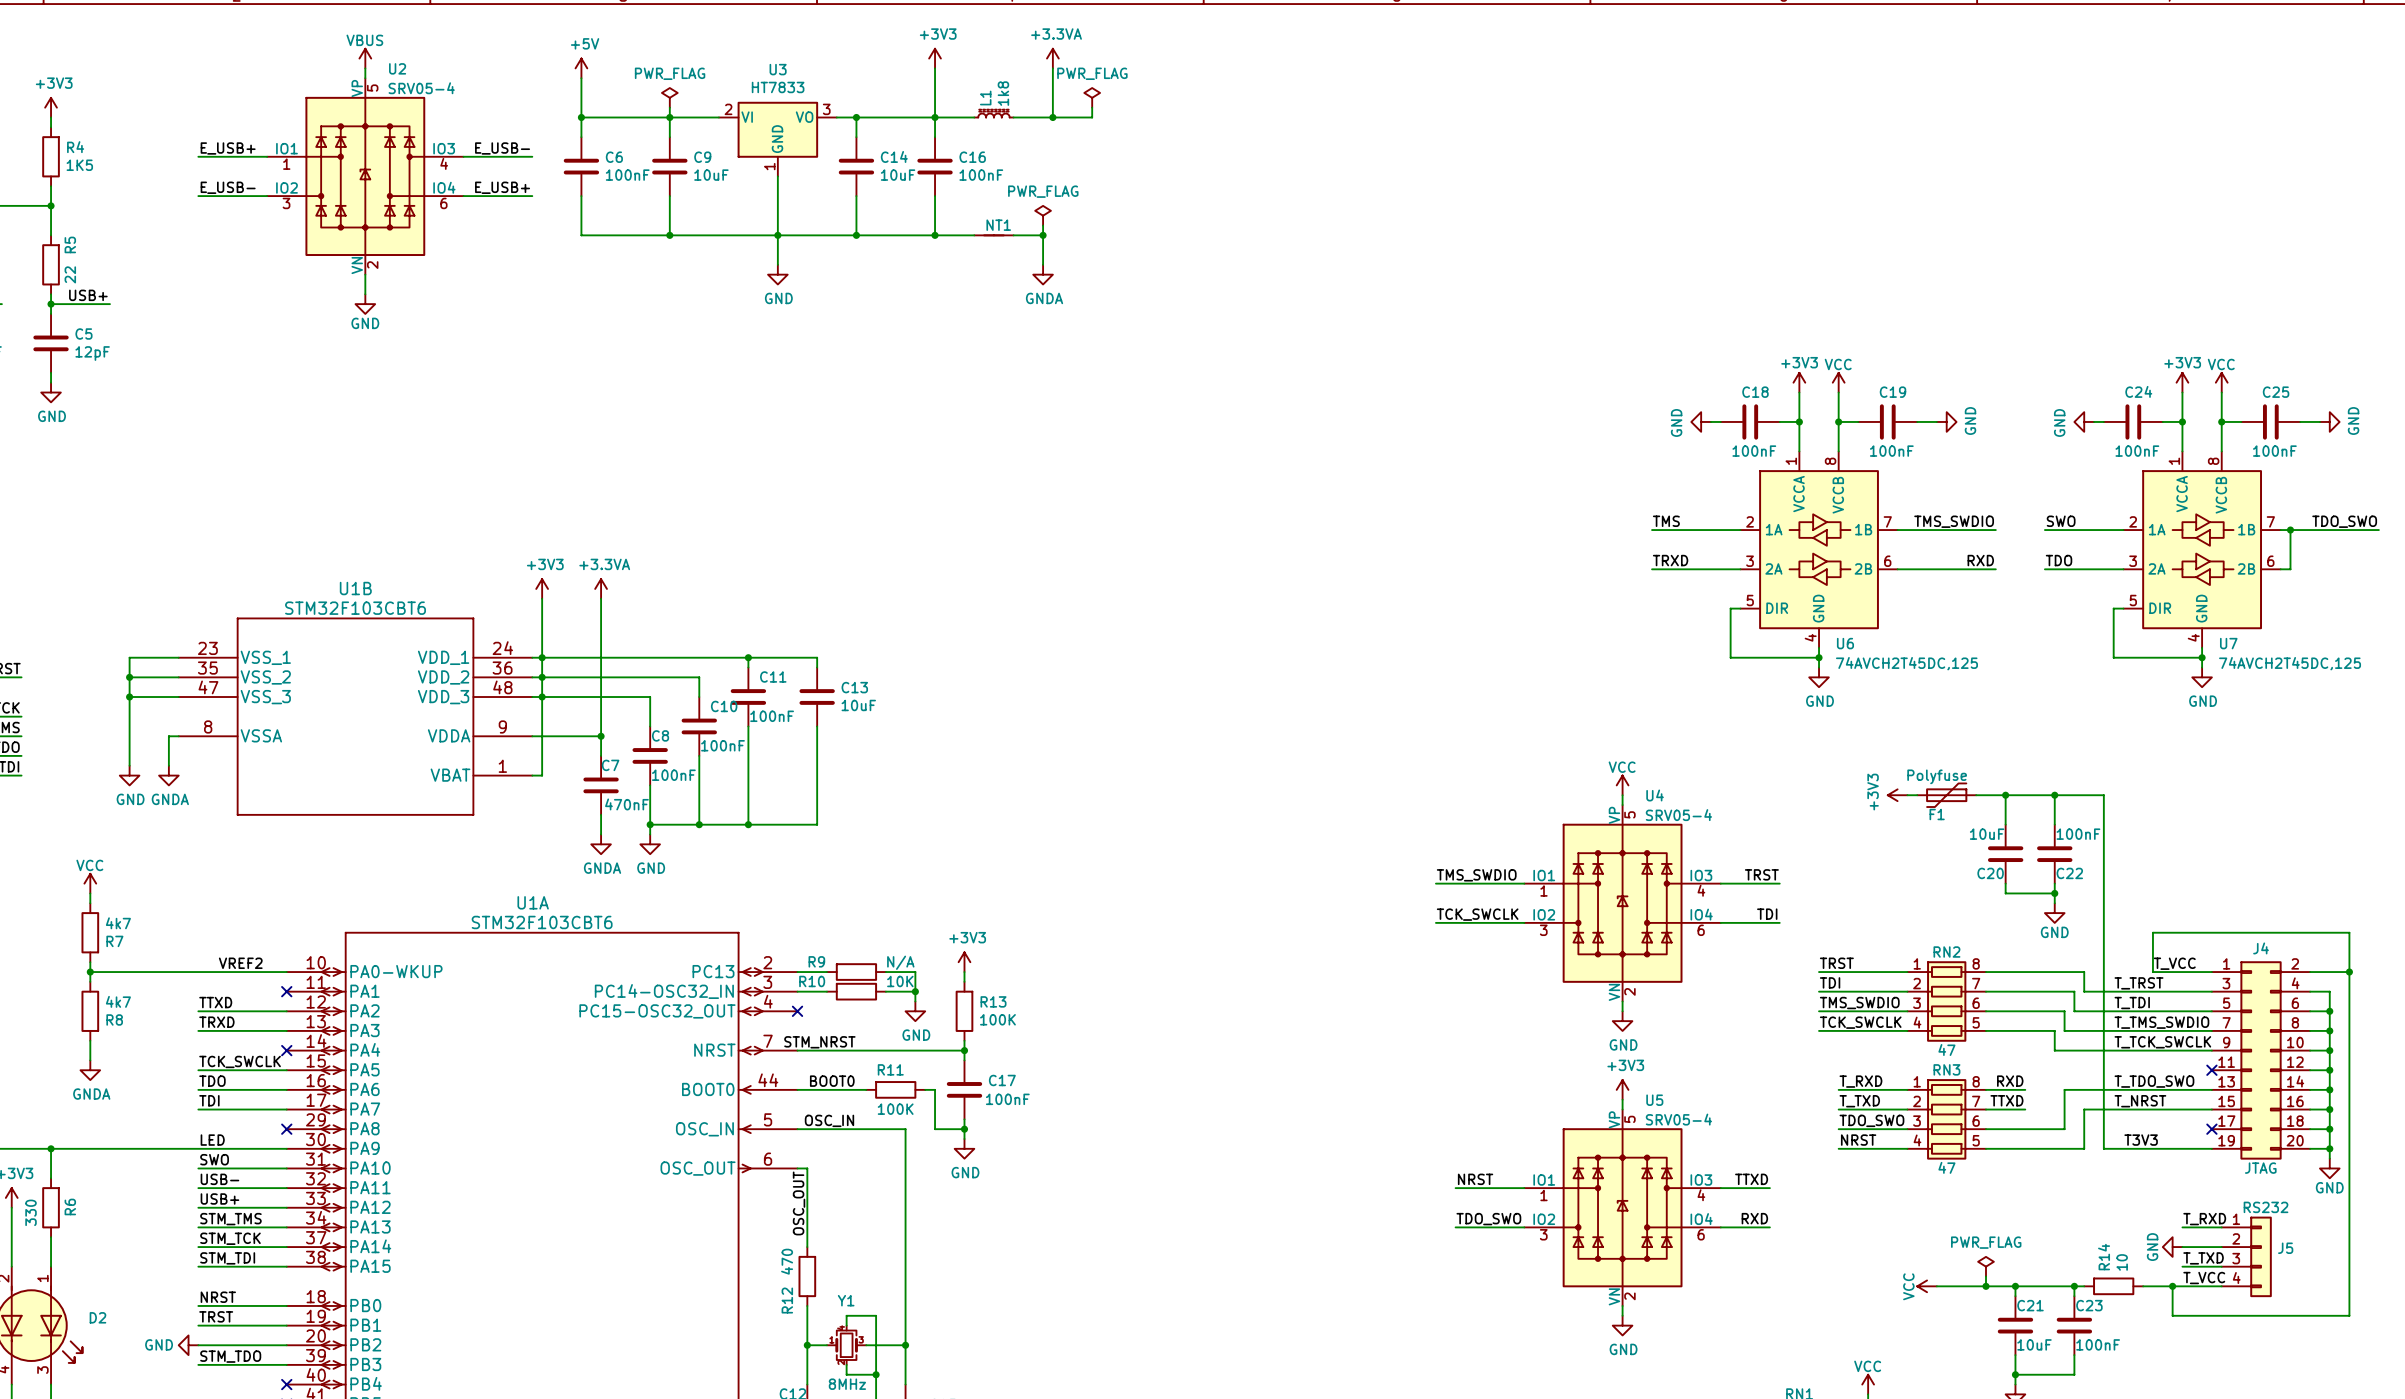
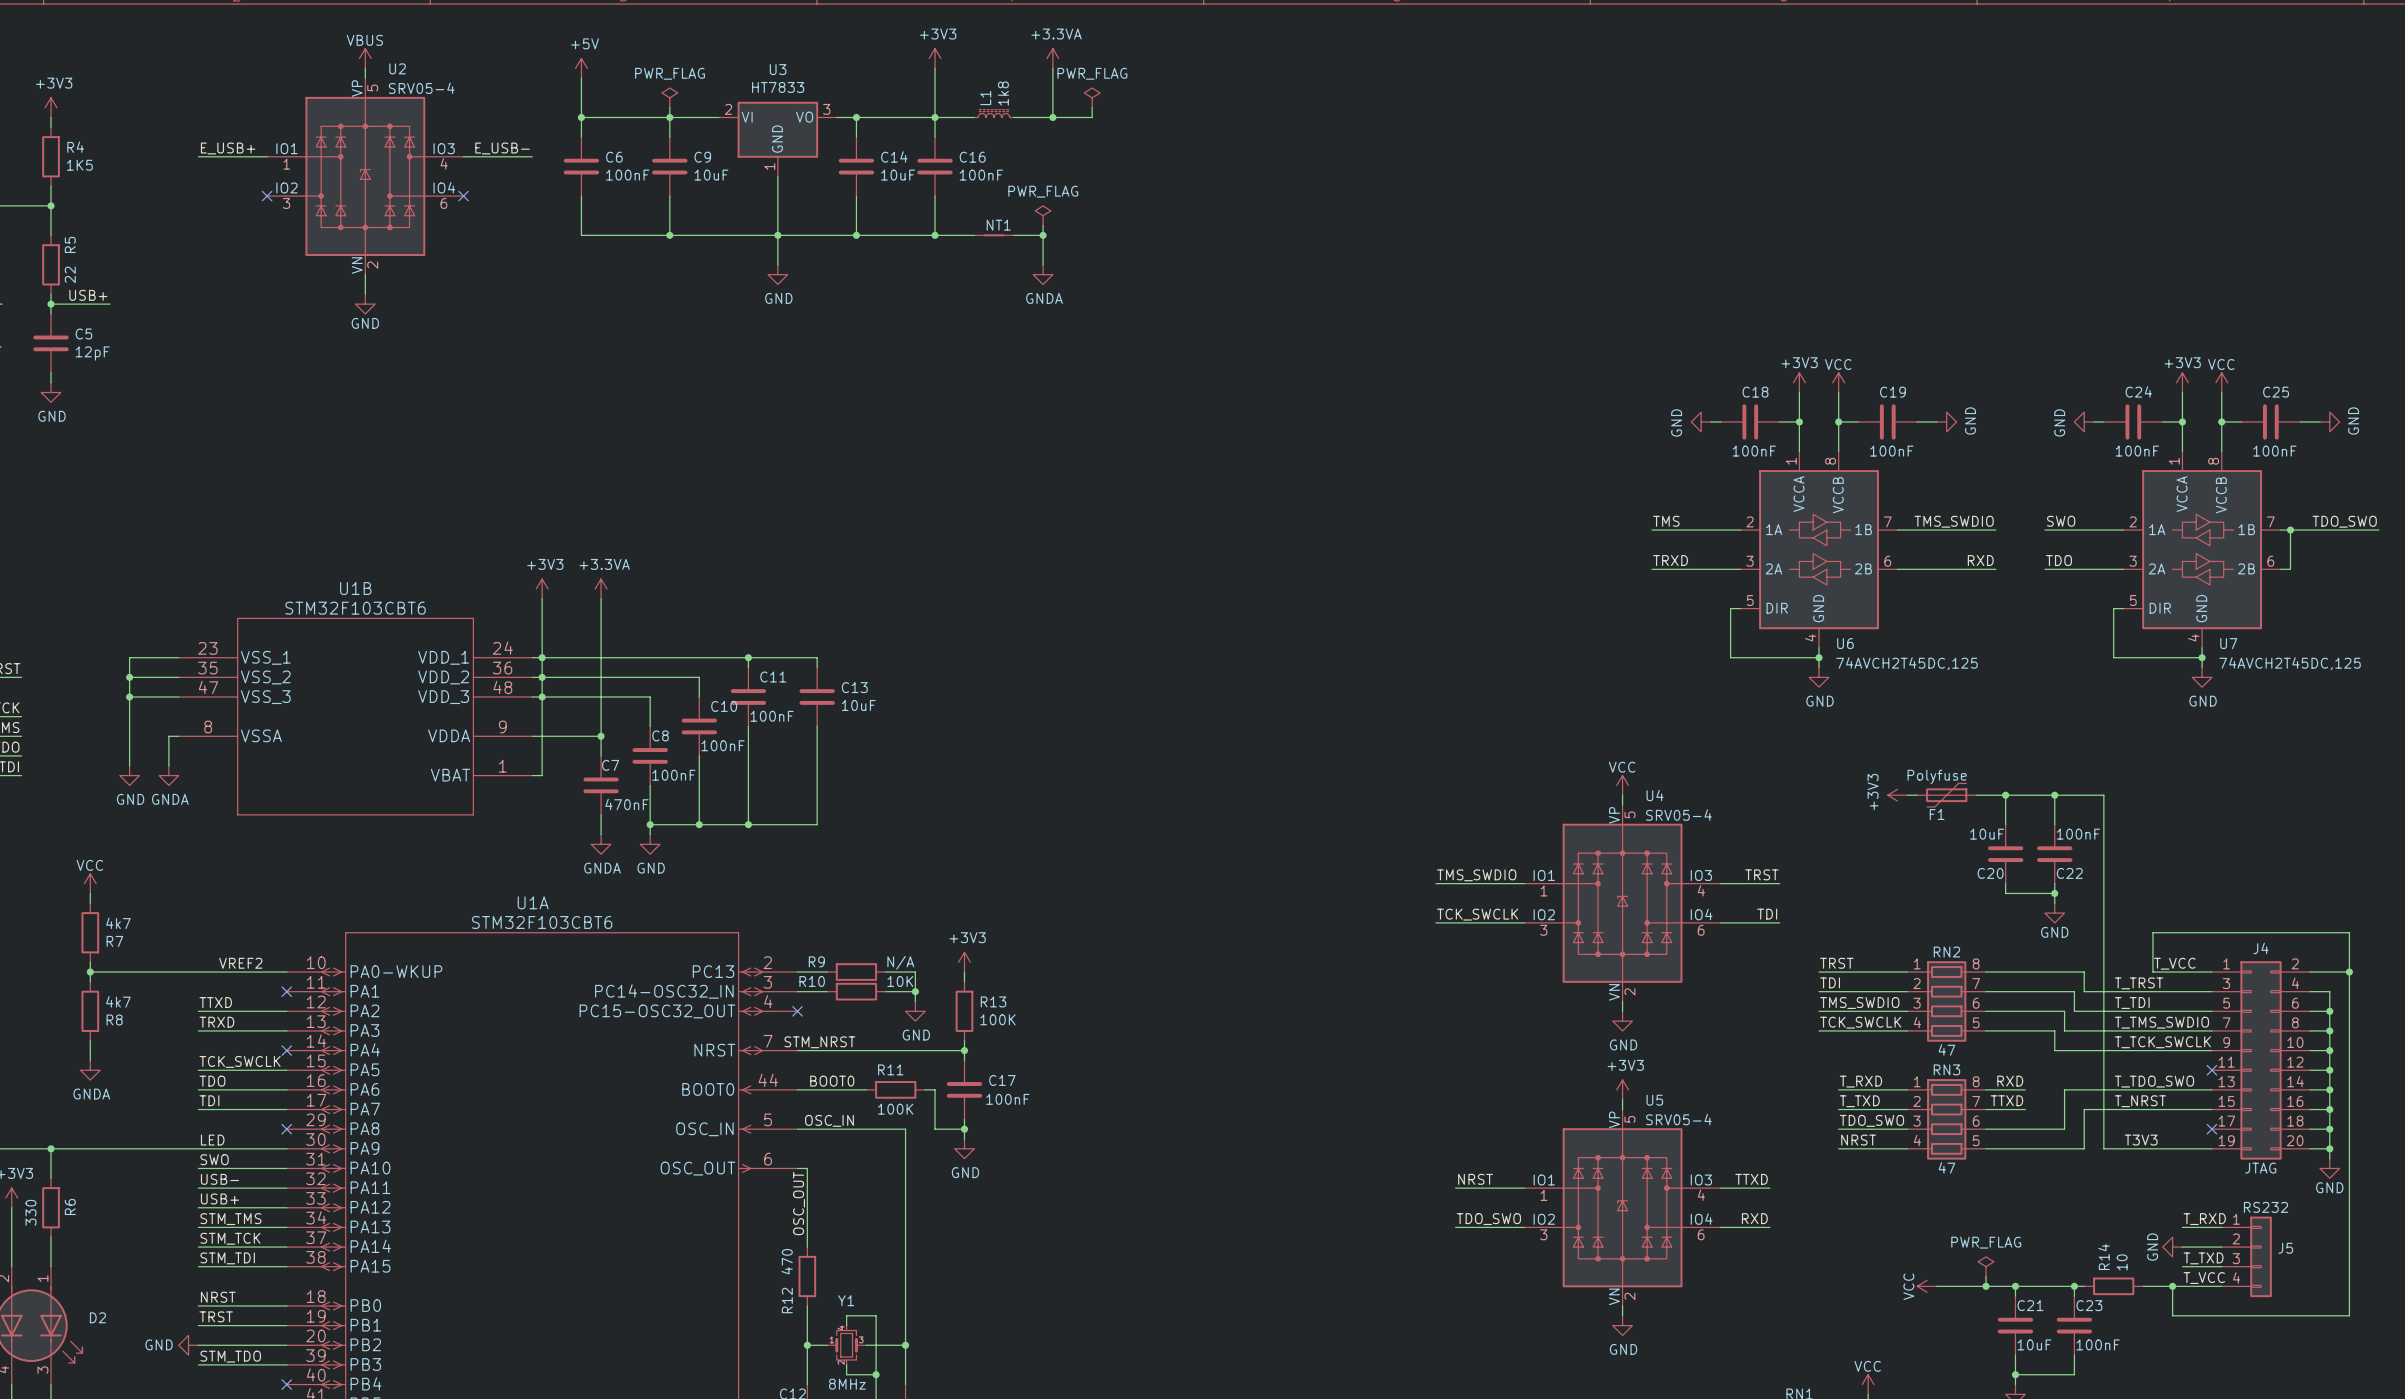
label: E_USB- (228, 187) -> none
label: E_USB+ (502, 187) -> none
wire: (198, 196) (267, 196) -> none
no-connect mark: none -> (267, 196)
wire: (463, 196) (532, 196) -> none
no-connect mark: none -> (463, 196)

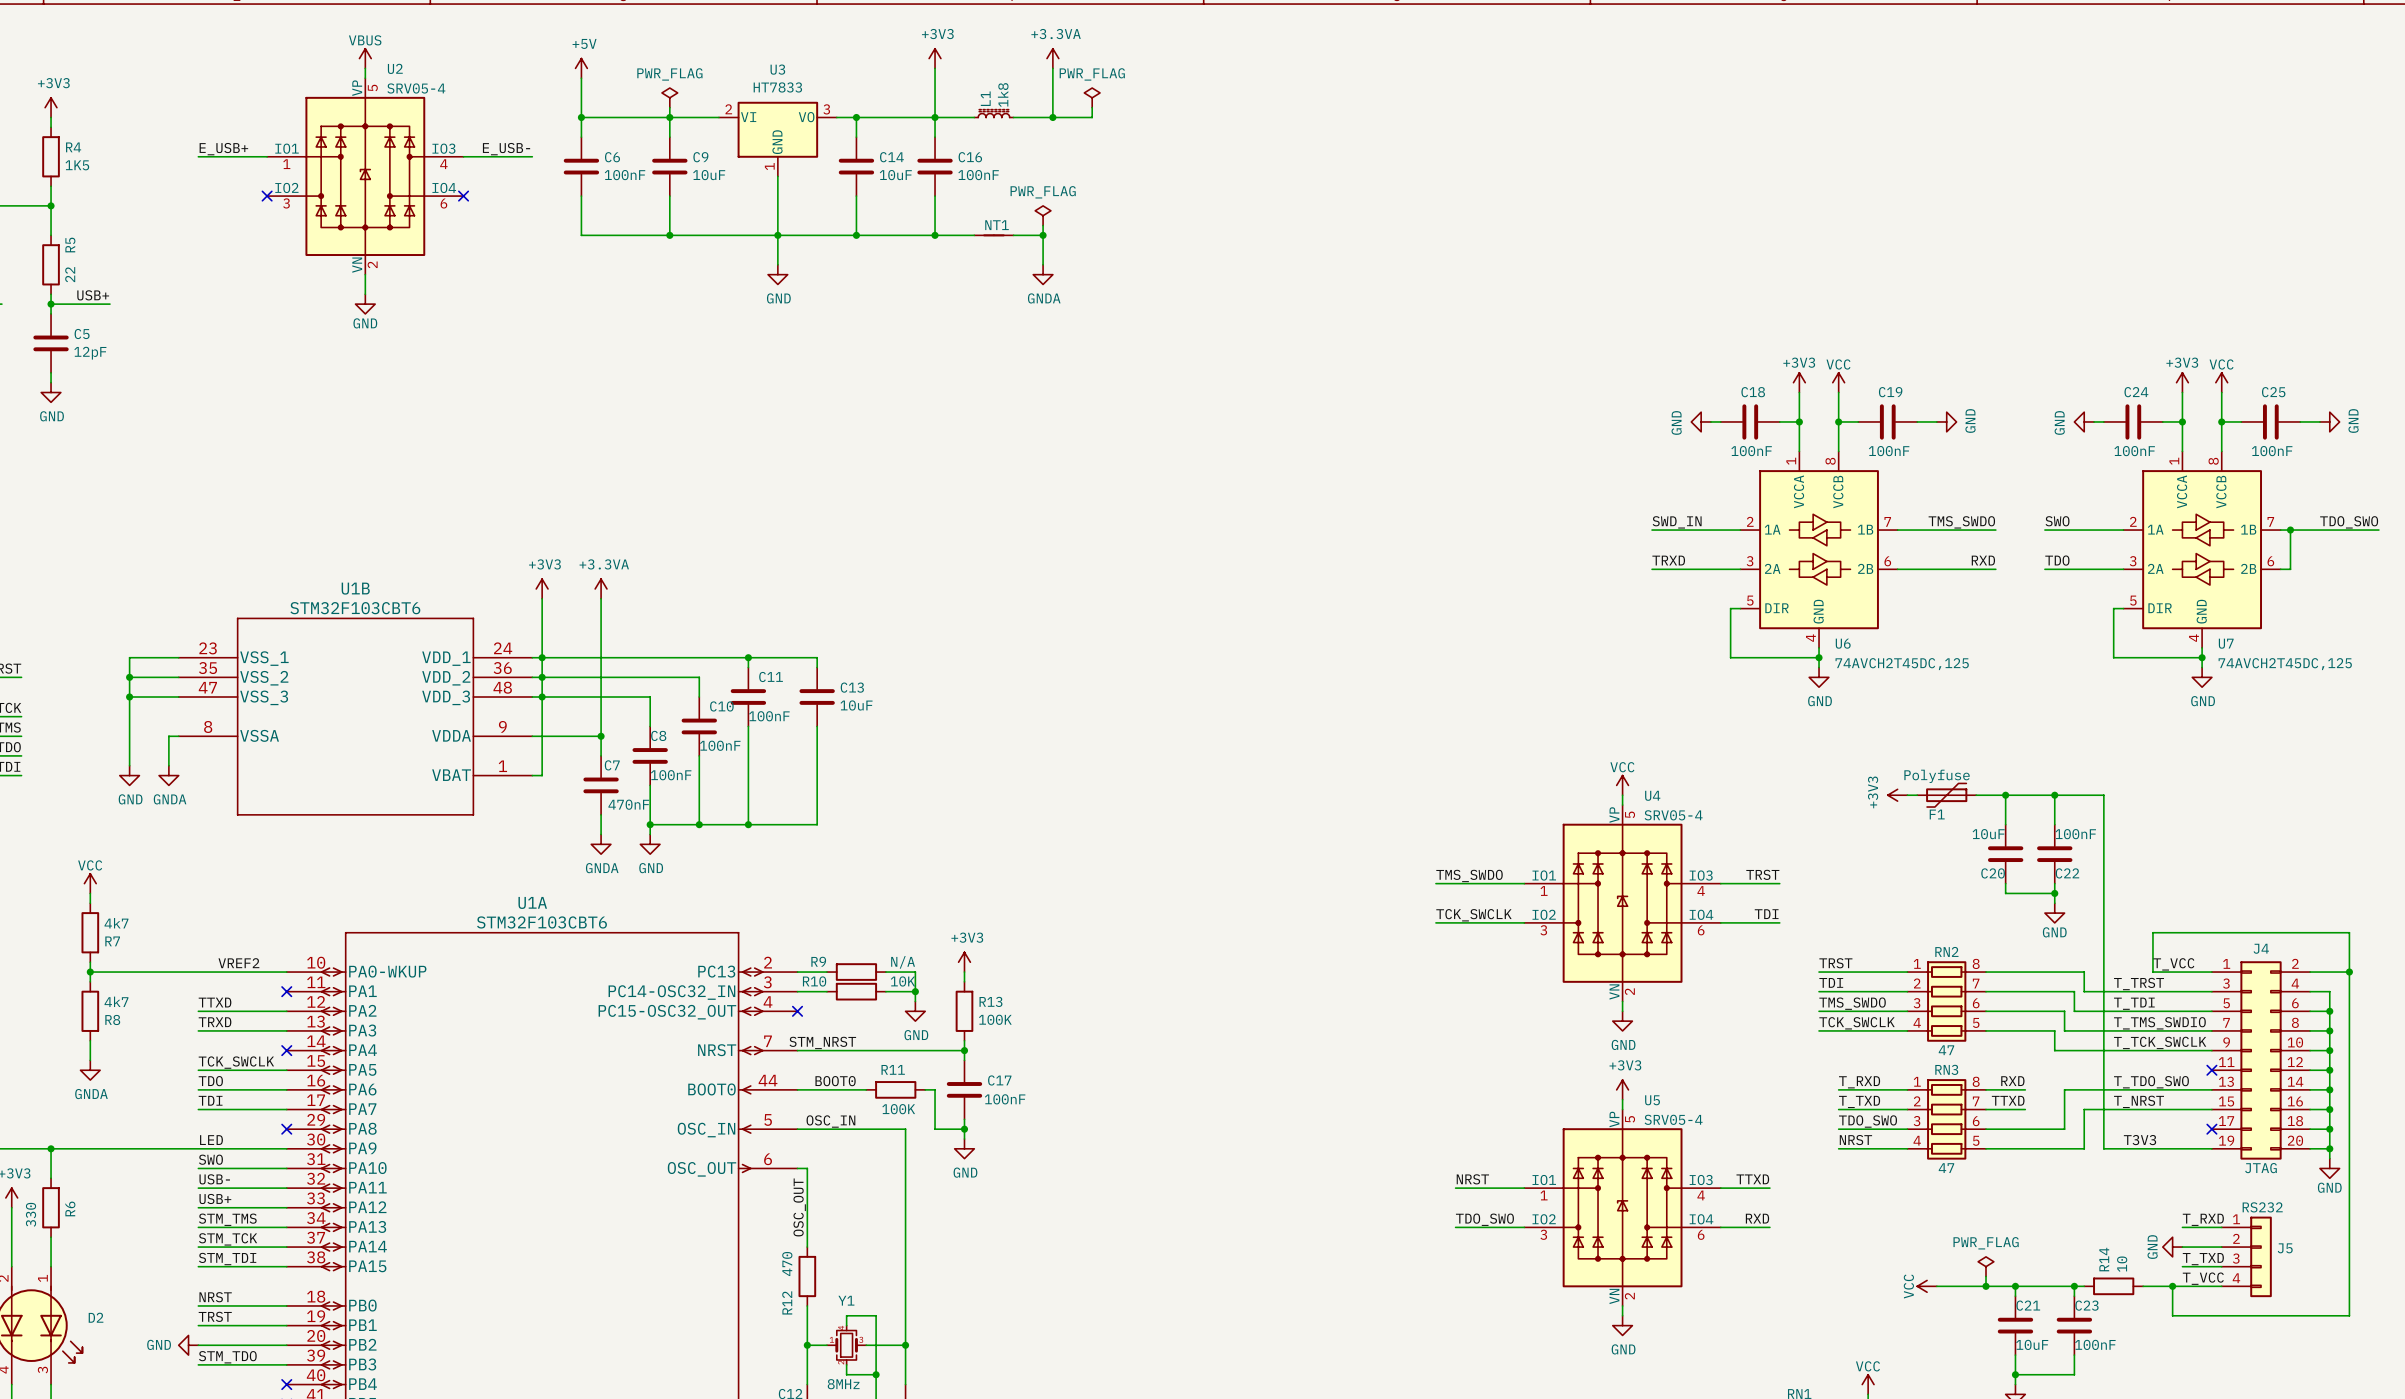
label: TMS (1666, 521) -> SWD_IN (1677, 522)
label: TMS_SWDIO (1954, 521) -> TMS_SWDO (1961, 522)
label: TMS_SWDIO (1476, 875) -> TMS_SWDO (1469, 875)
label: TMS_SWDIO (1859, 1003) -> TMS_SWDO (1852, 1003)

